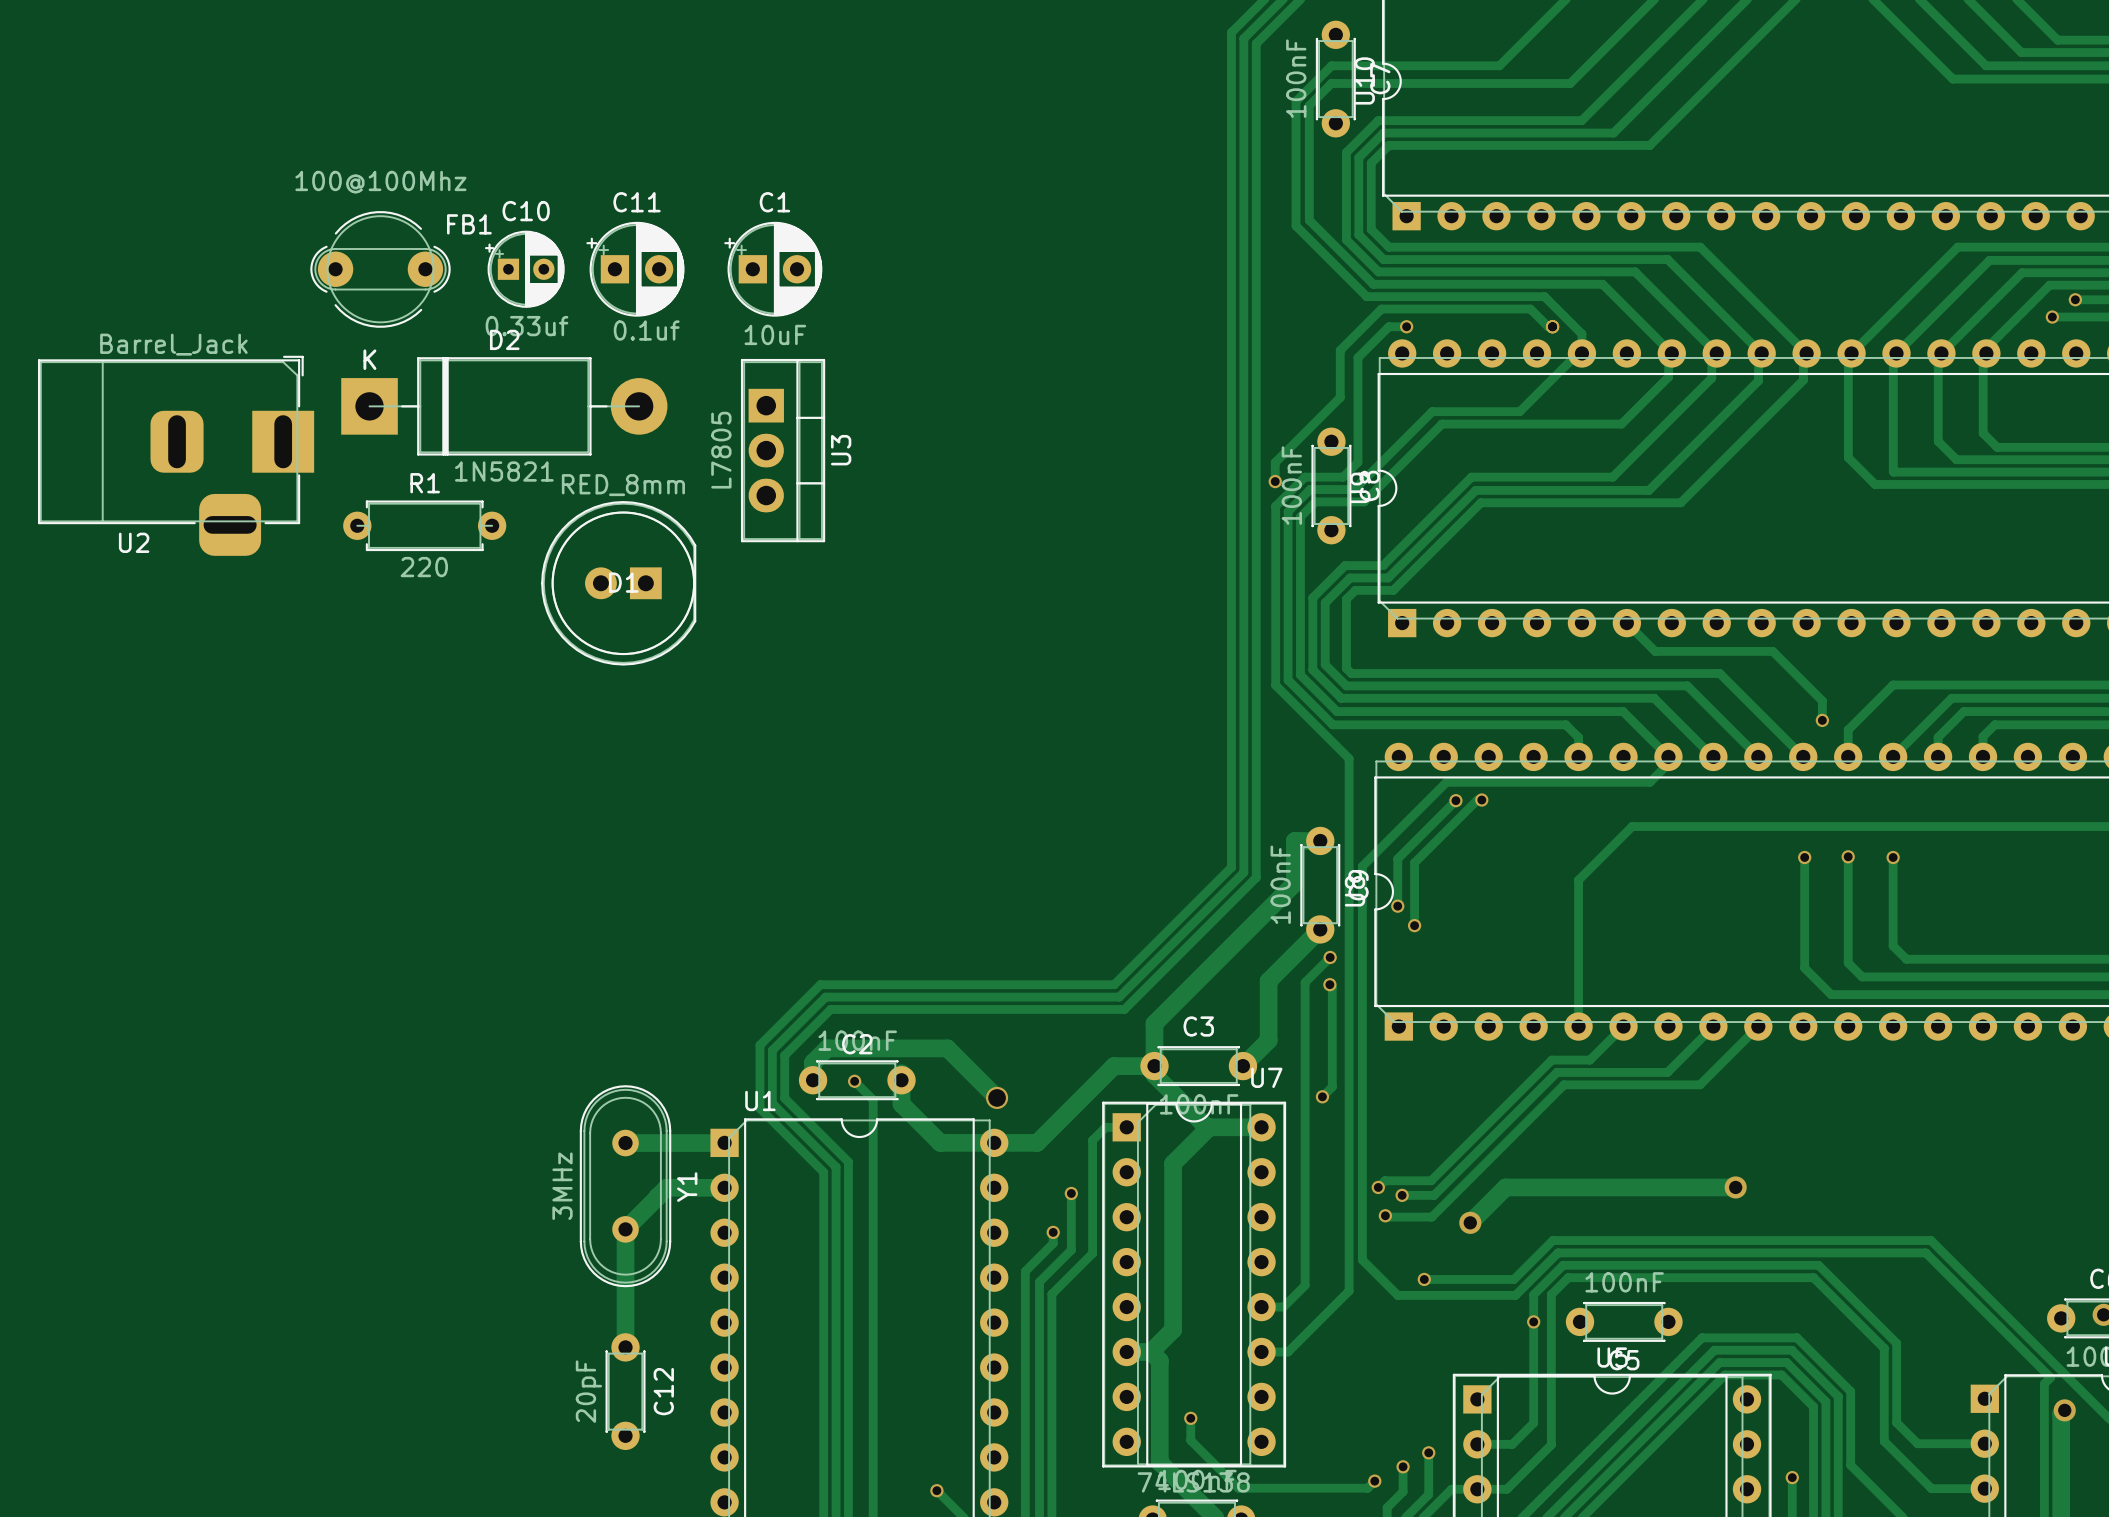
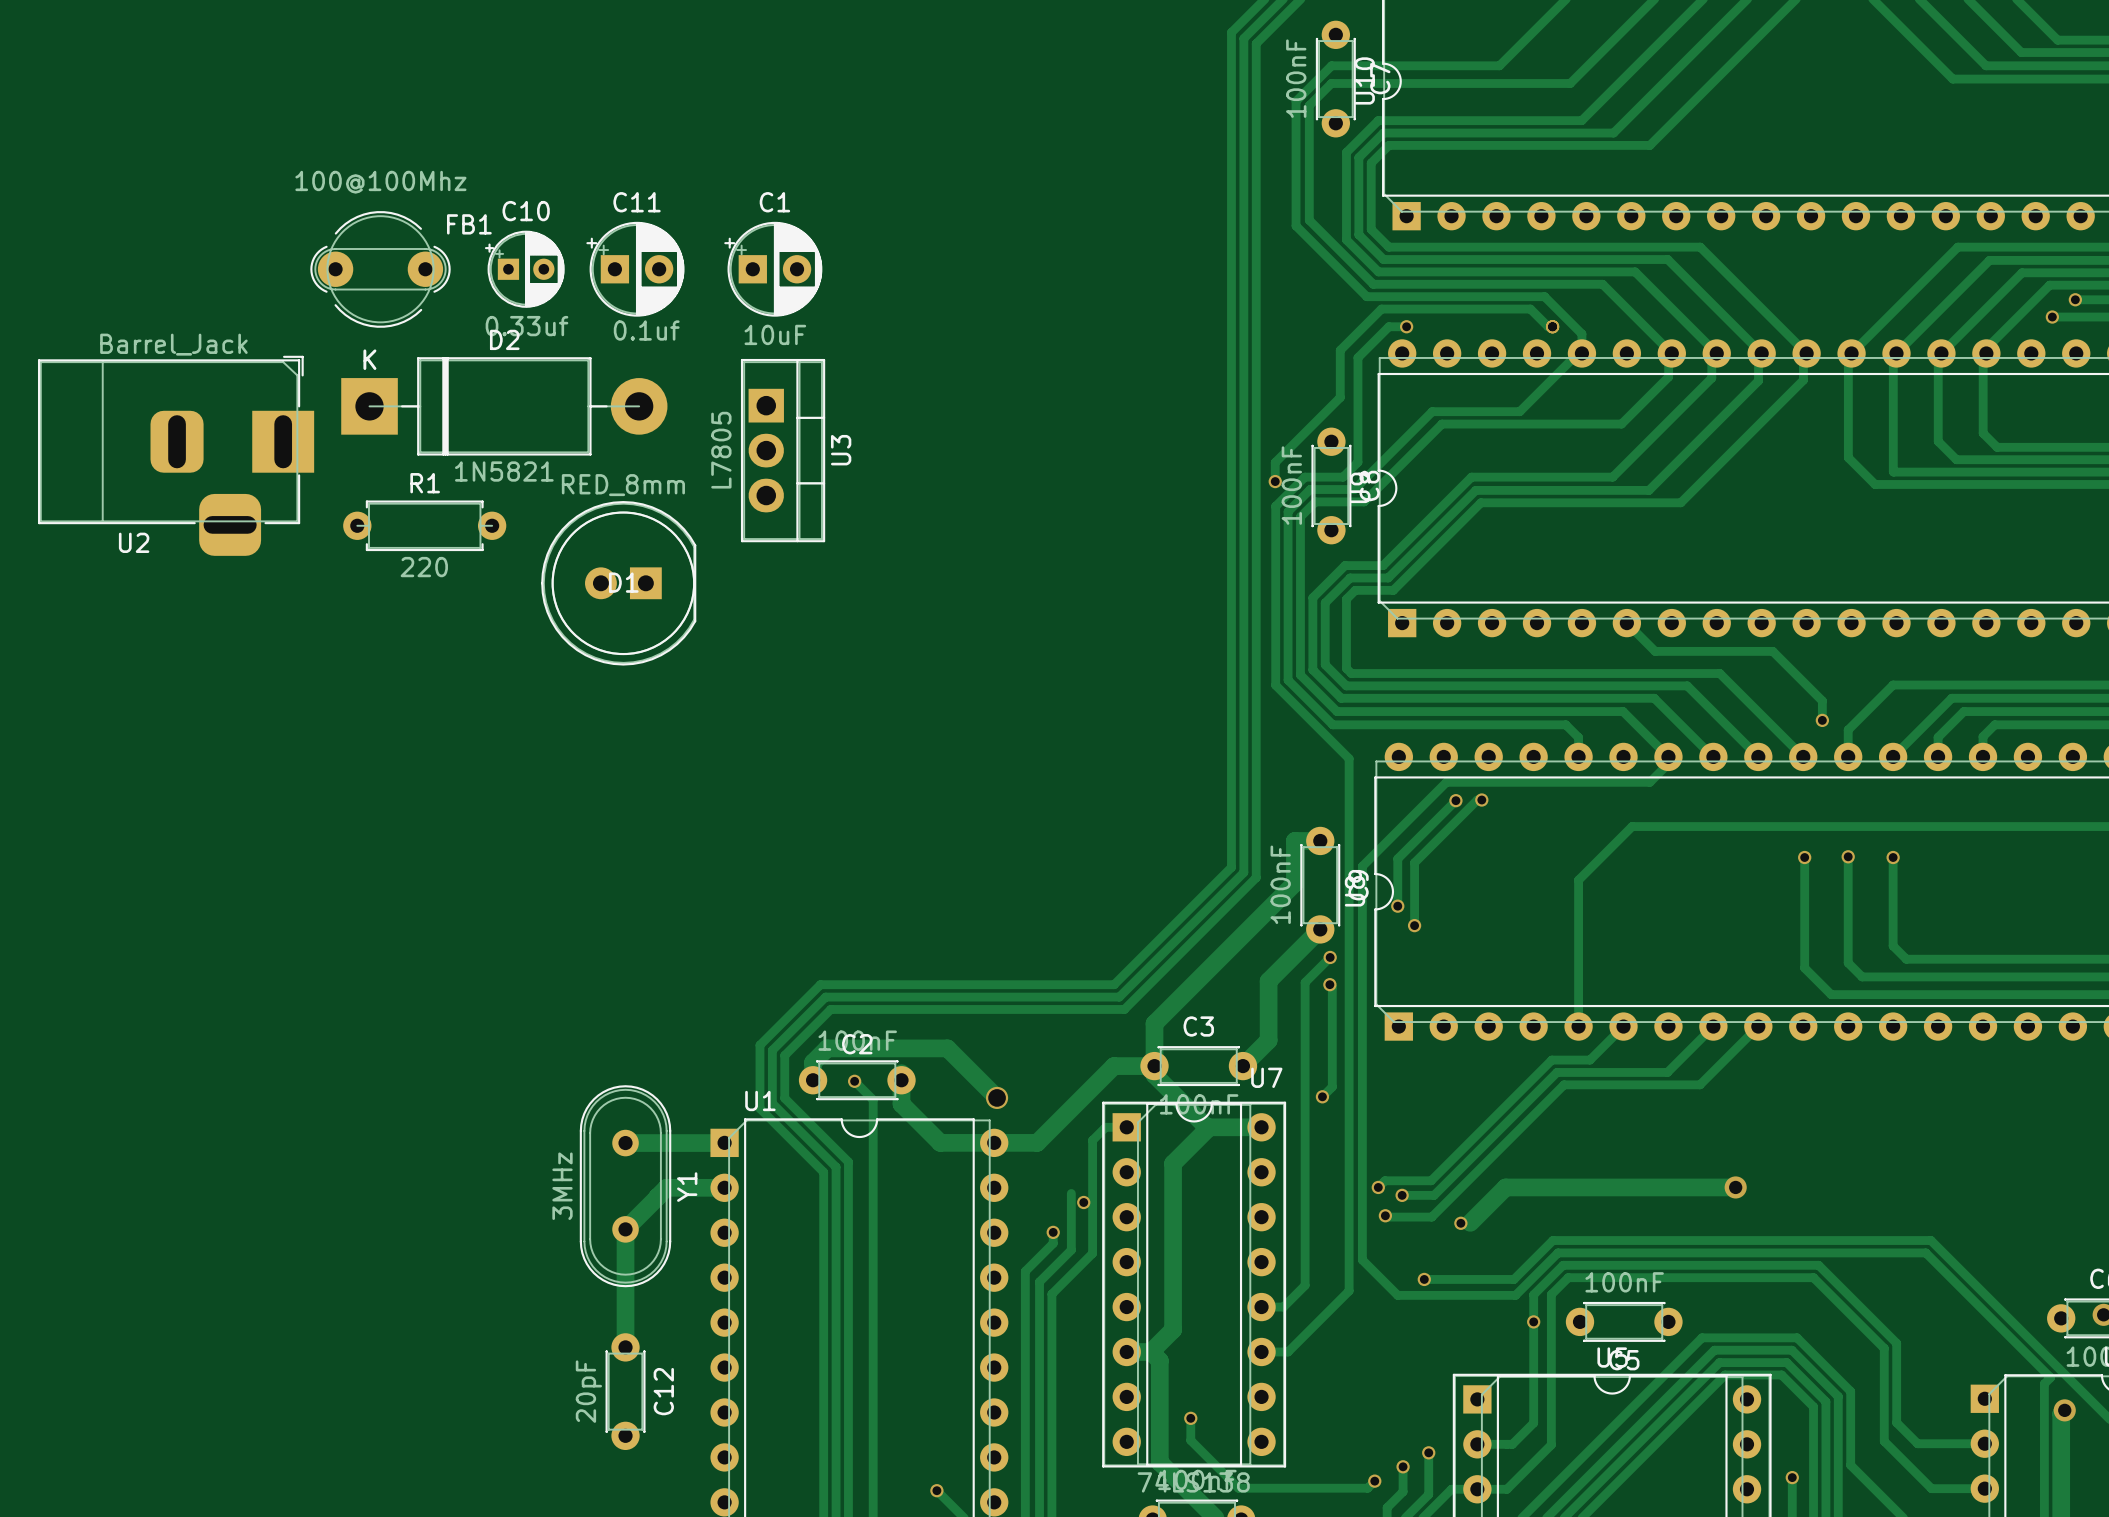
via position: (1071, 1193) -> (1083, 1202)
via size: [1459, 1211, 1482, 1234] -> [1454, 1216, 1468, 1230]

